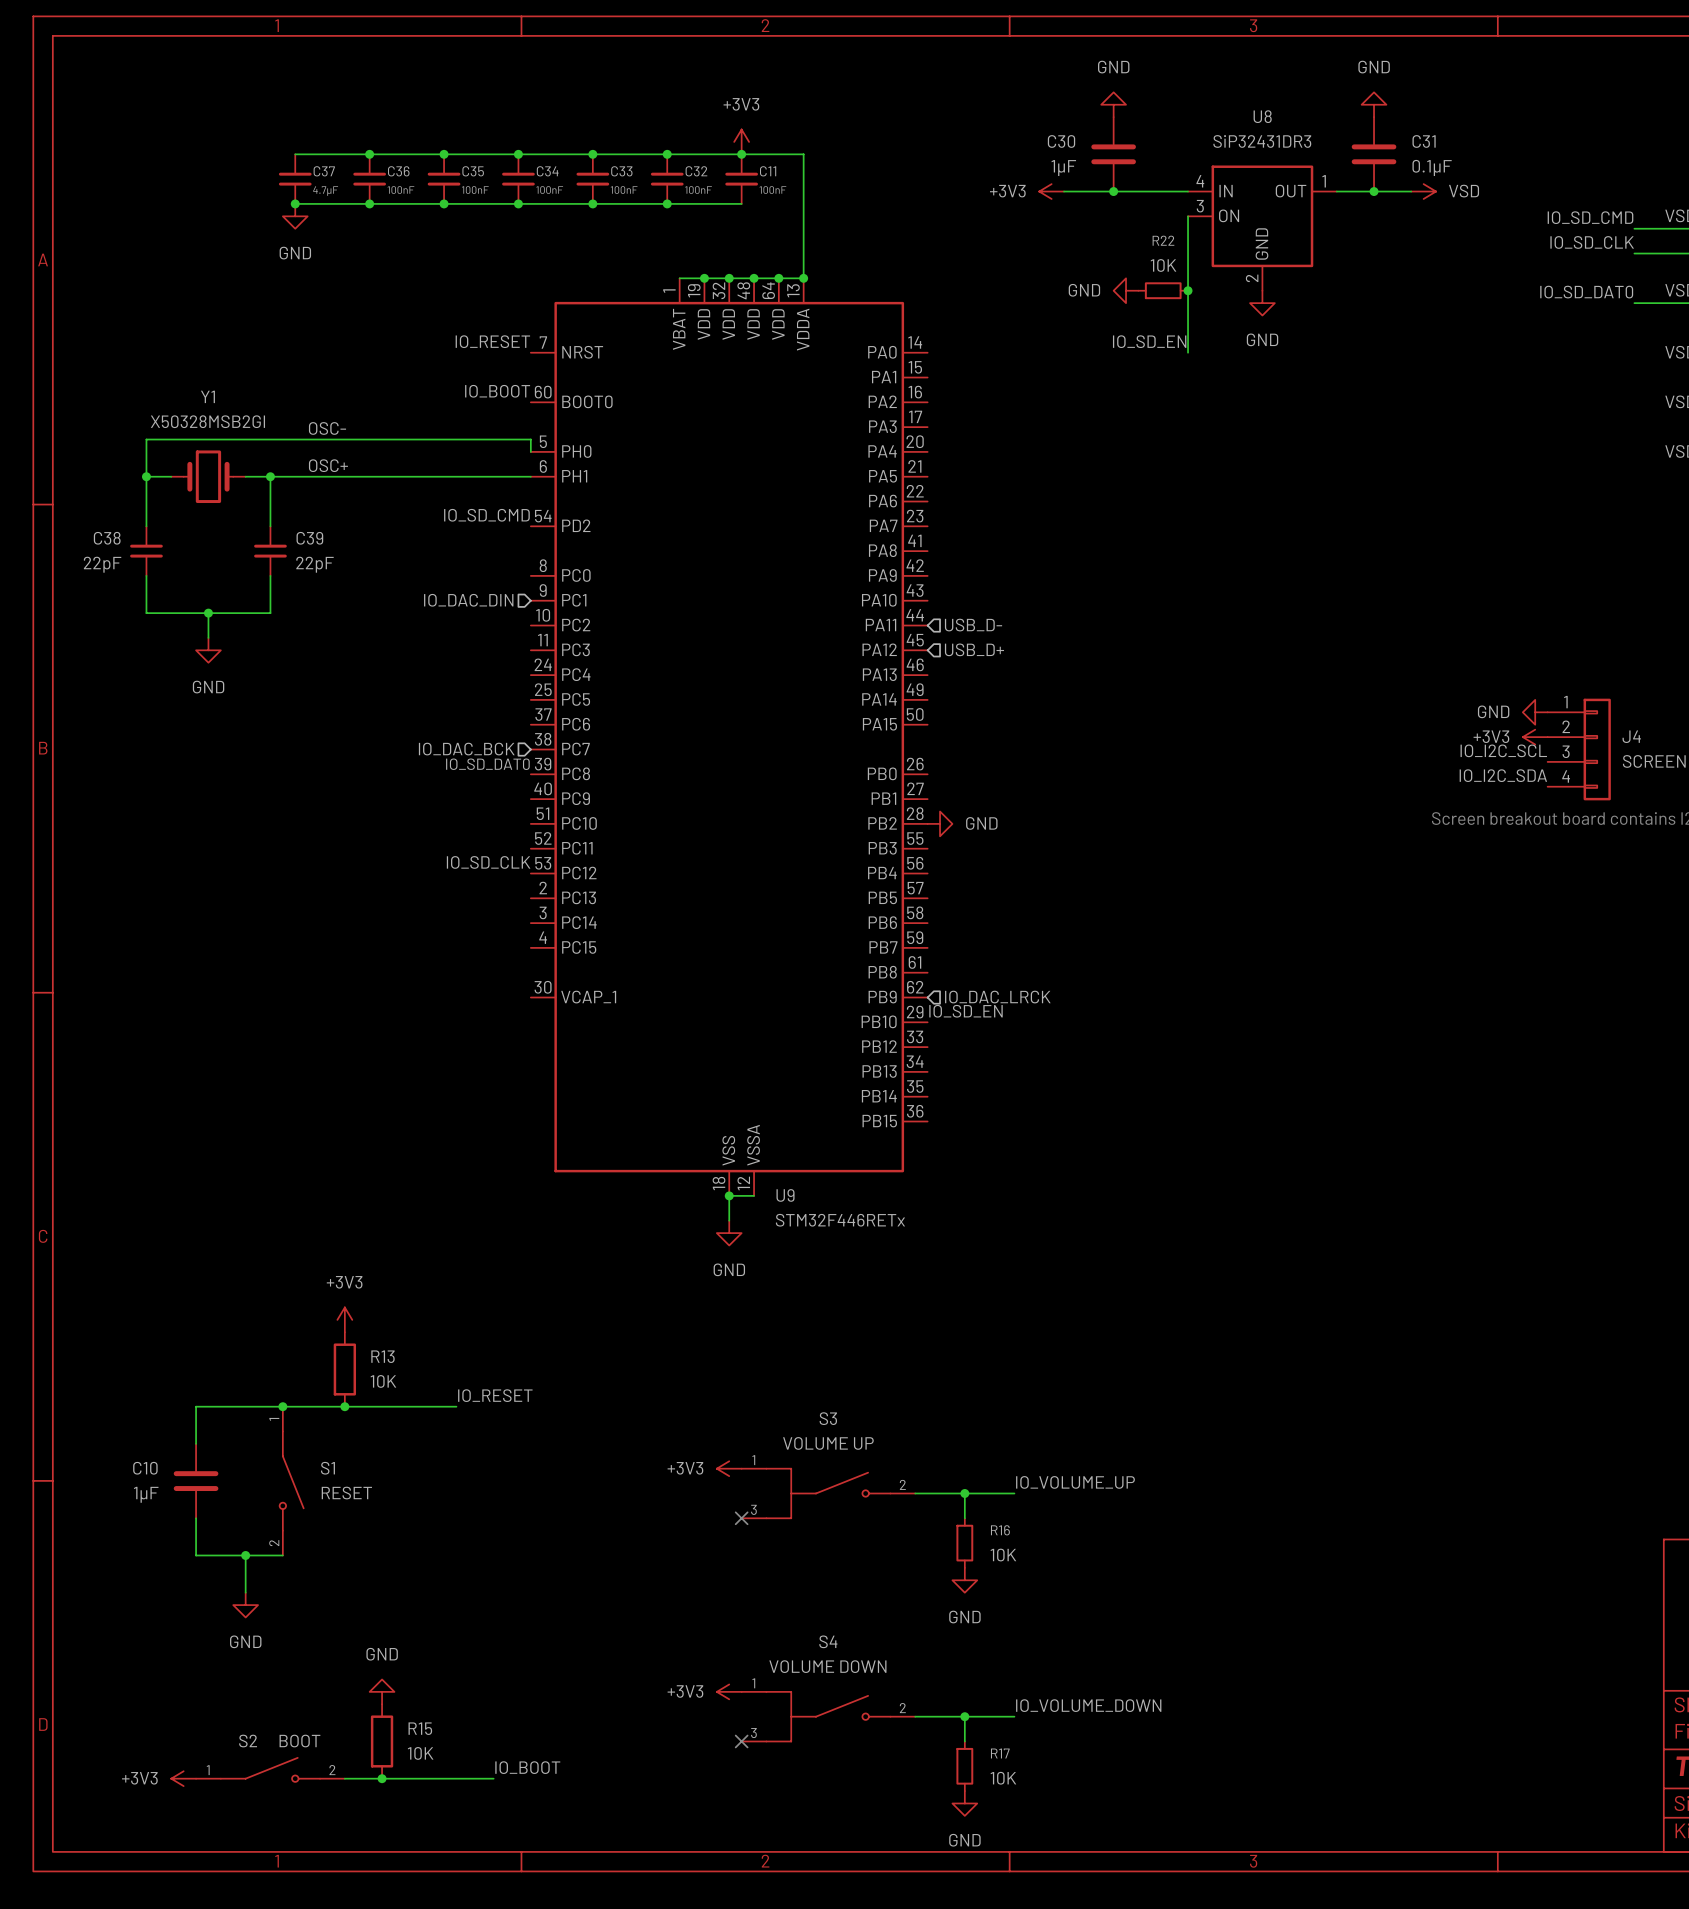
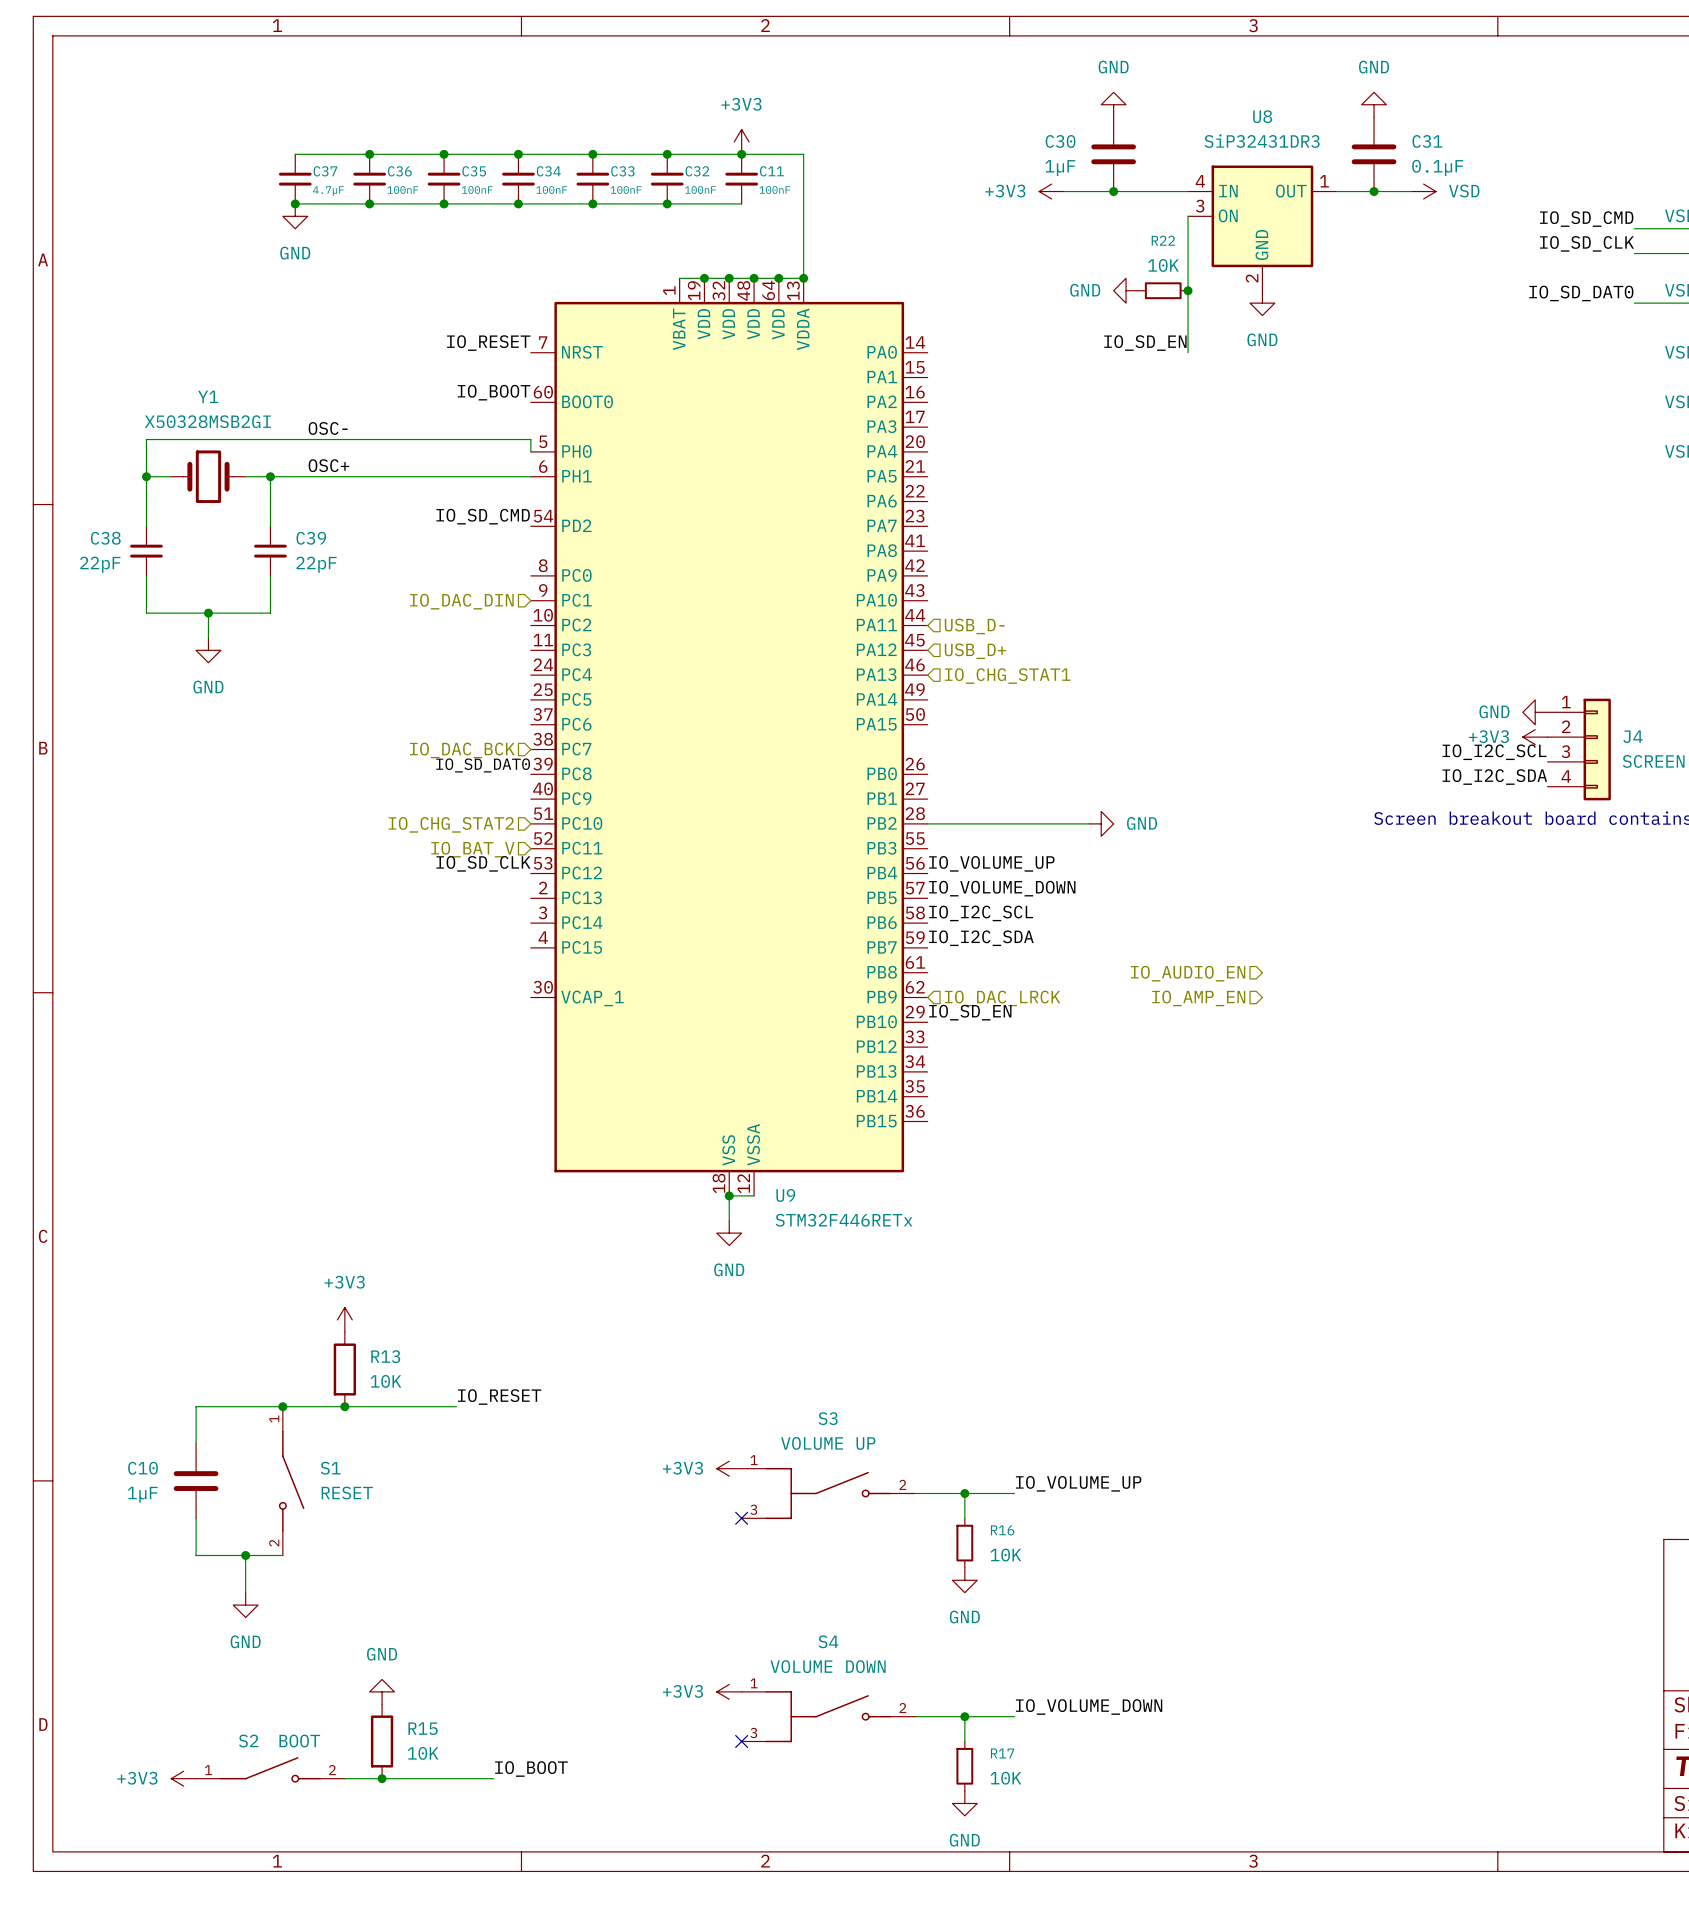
hierarchical label: none -> IO_CHG_STAT1 (1007, 676)
hierarchical label: none -> IO_CHG_STAT2 (451, 824)
wire: none -> (927, 823) (1088, 823)
power symbol position: GND (940, 823) -> GND (1101, 823)
hierarchical label: none -> IO_BAT_V (472, 849)
label: none -> IO_VOLUME_UP (991, 863)
label: none -> IO_VOLUME_DOWN (1002, 888)
label: none -> IO_I2C_SCL (981, 913)
label: none -> IO_I2C_SDA (981, 938)
hierarchical label: none -> IO_AUDIO_EN (1188, 973)
hierarchical label: none -> IO_AMP_EN (1198, 998)

